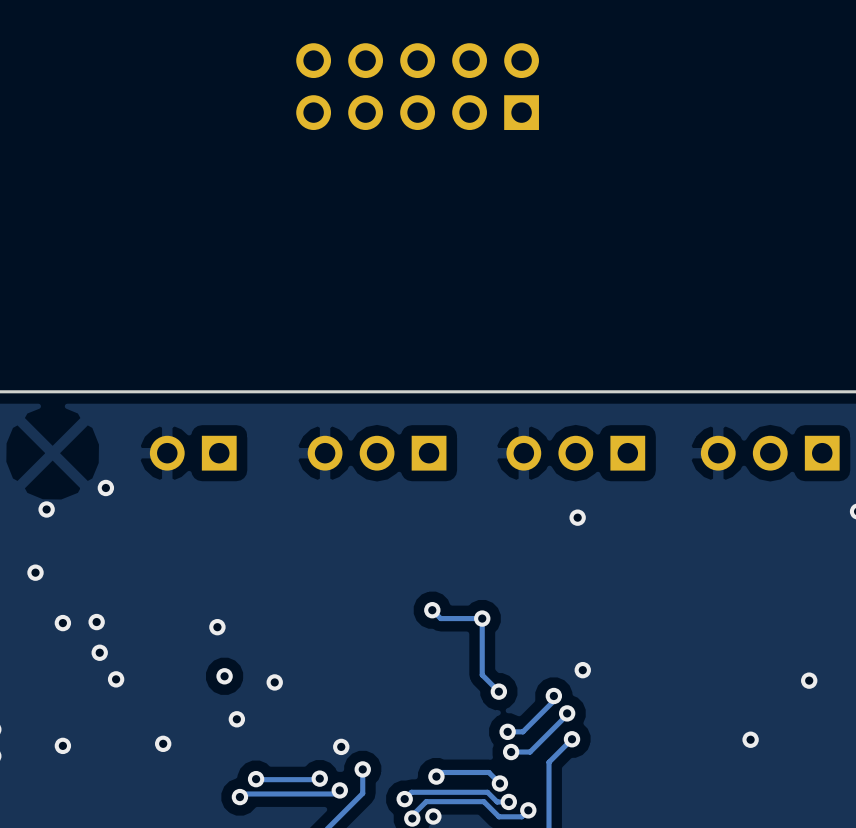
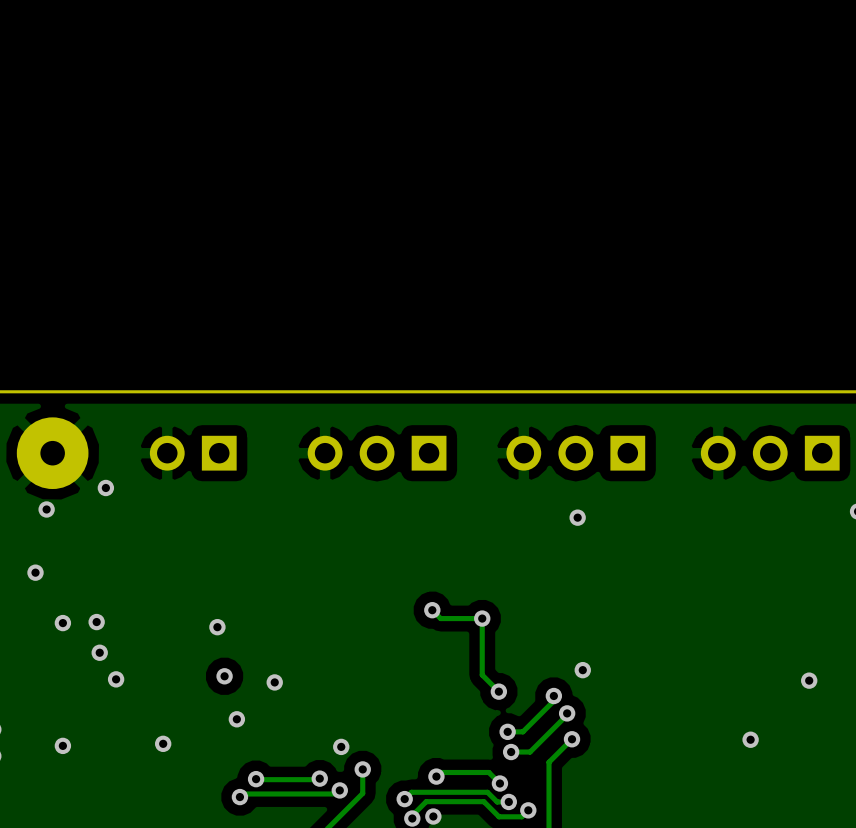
part: (417, 86) -> none
part: none -> (52, 453)

